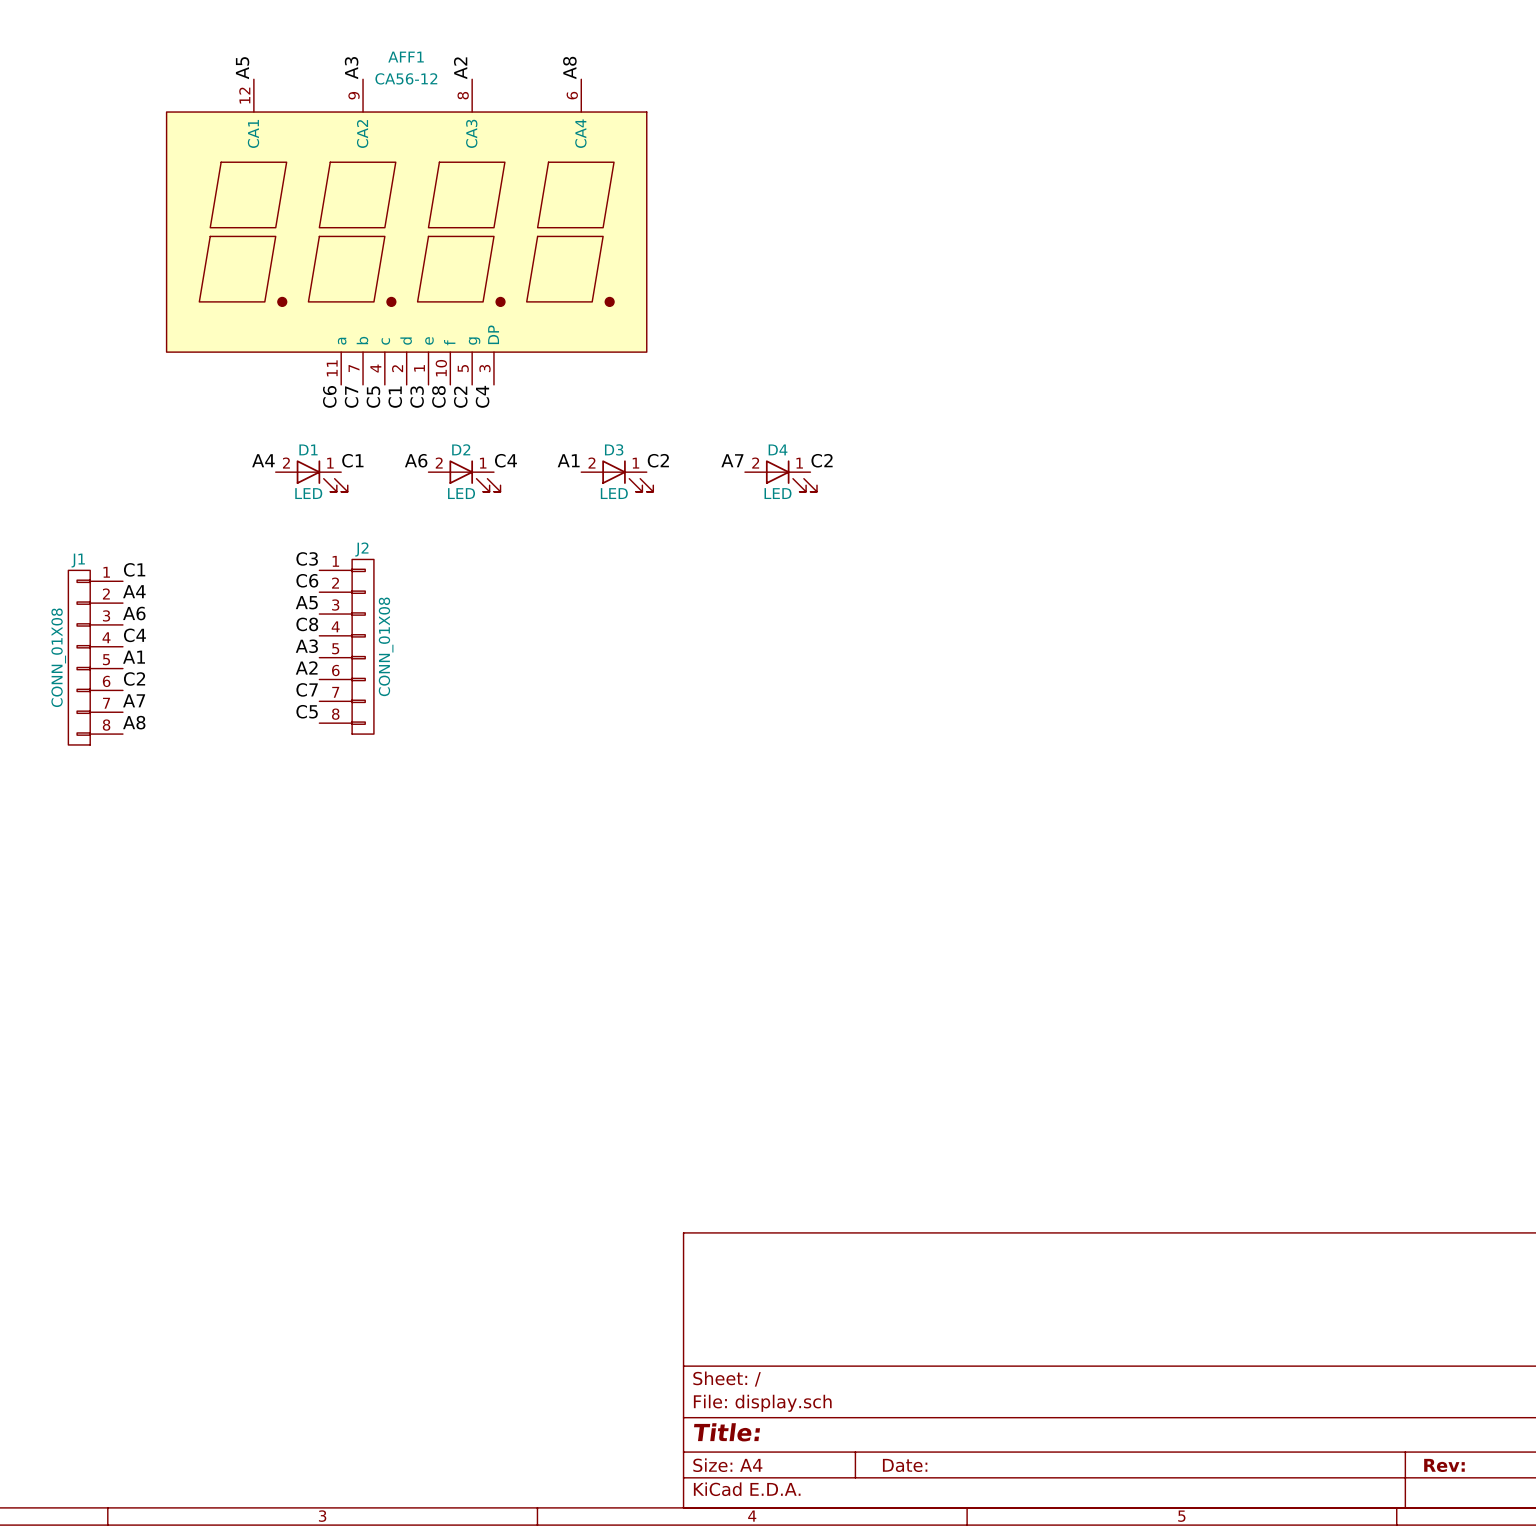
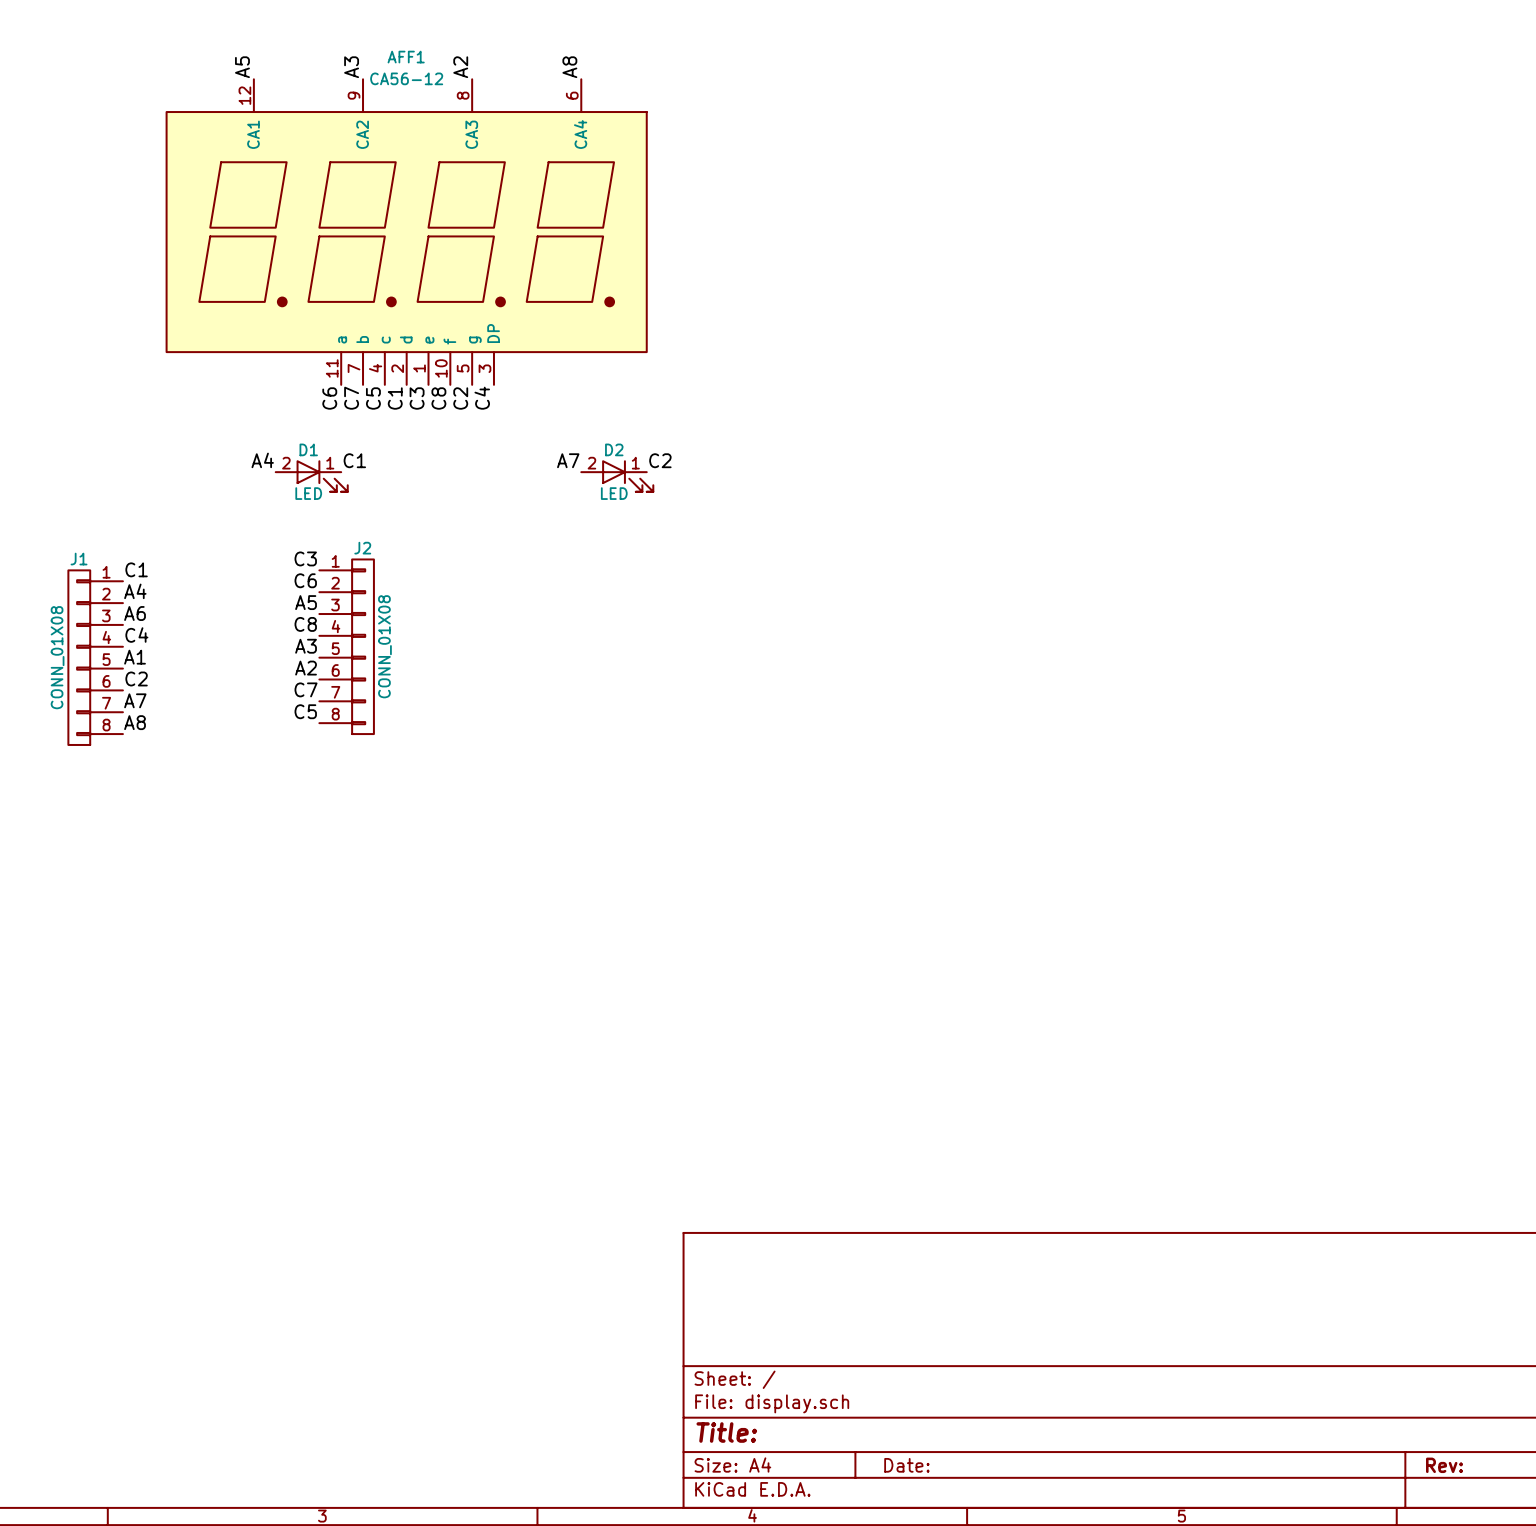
D3 name: D3 (614, 449) -> D2 (614, 449)
label: A6 (416, 460) -> none
label: C4 (505, 460) -> none
label: A1 (568, 460) -> A7 (568, 460)
label: A7 (732, 460) -> none
label: C2 (822, 460) -> none
D2: LED (464, 476) -> none
D4: LED (780, 476) -> none

